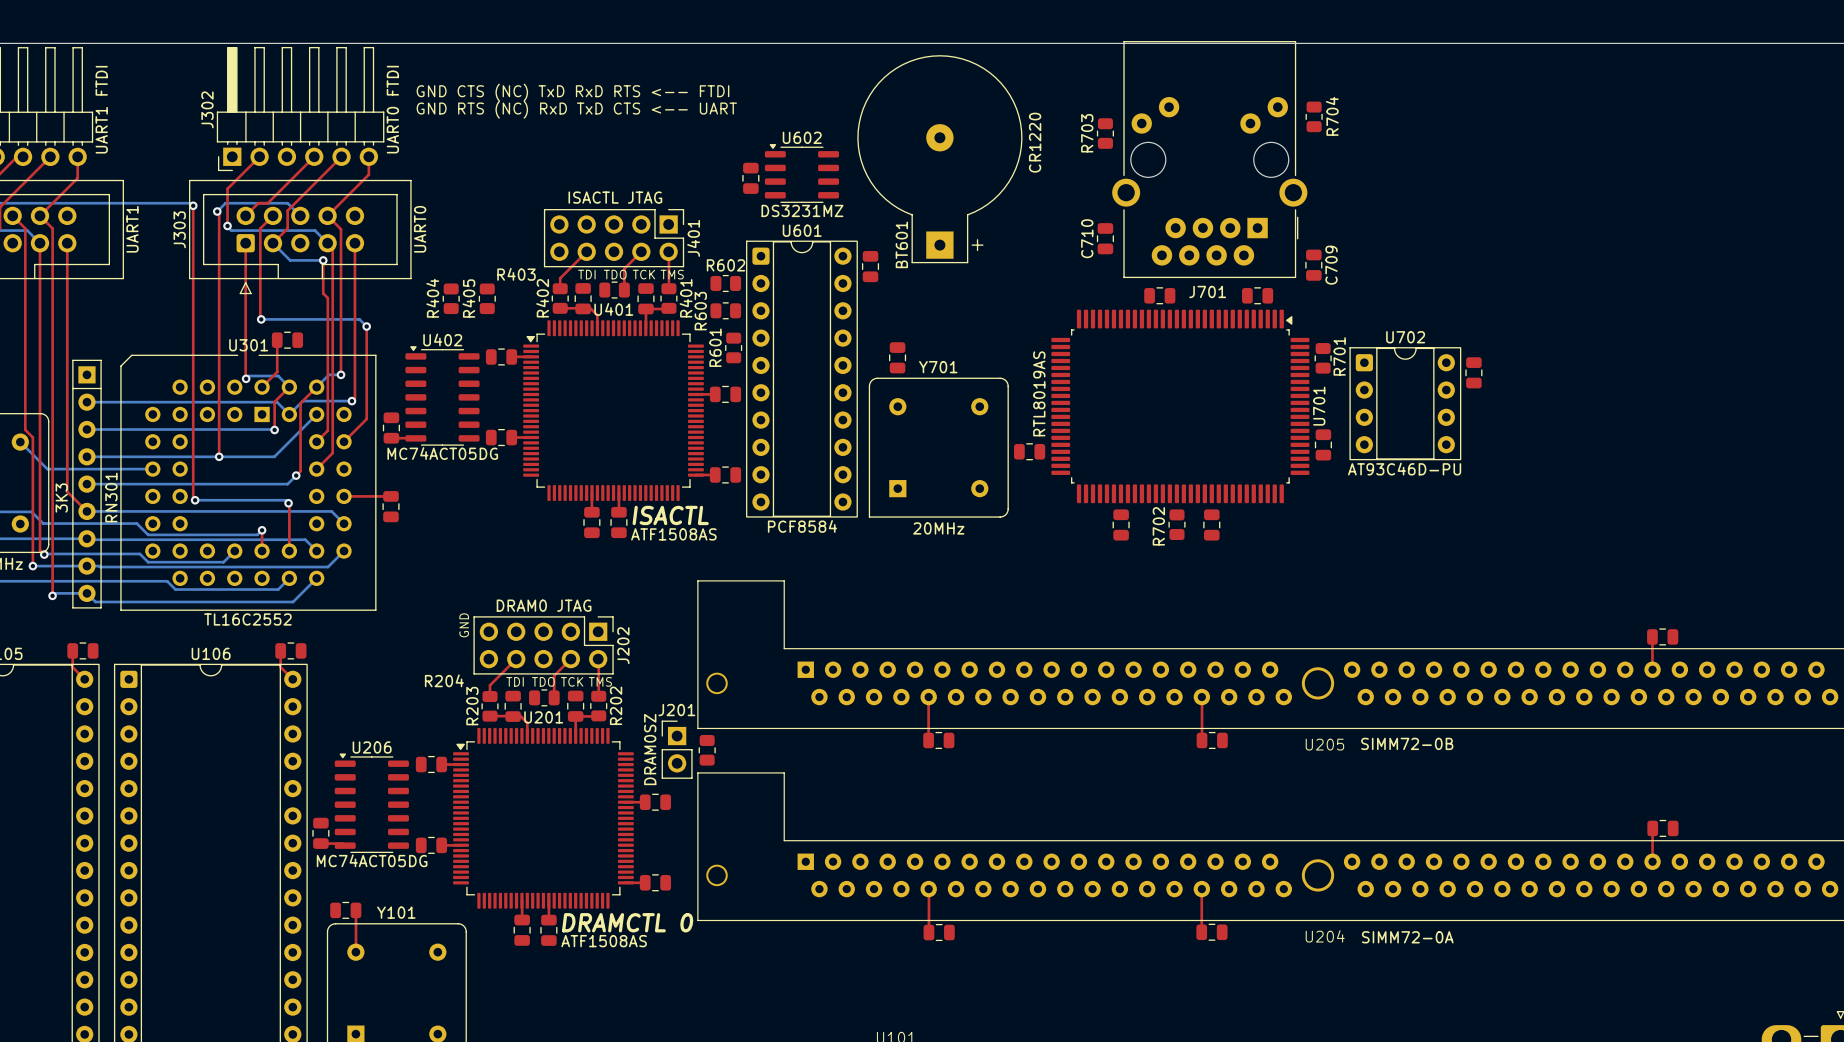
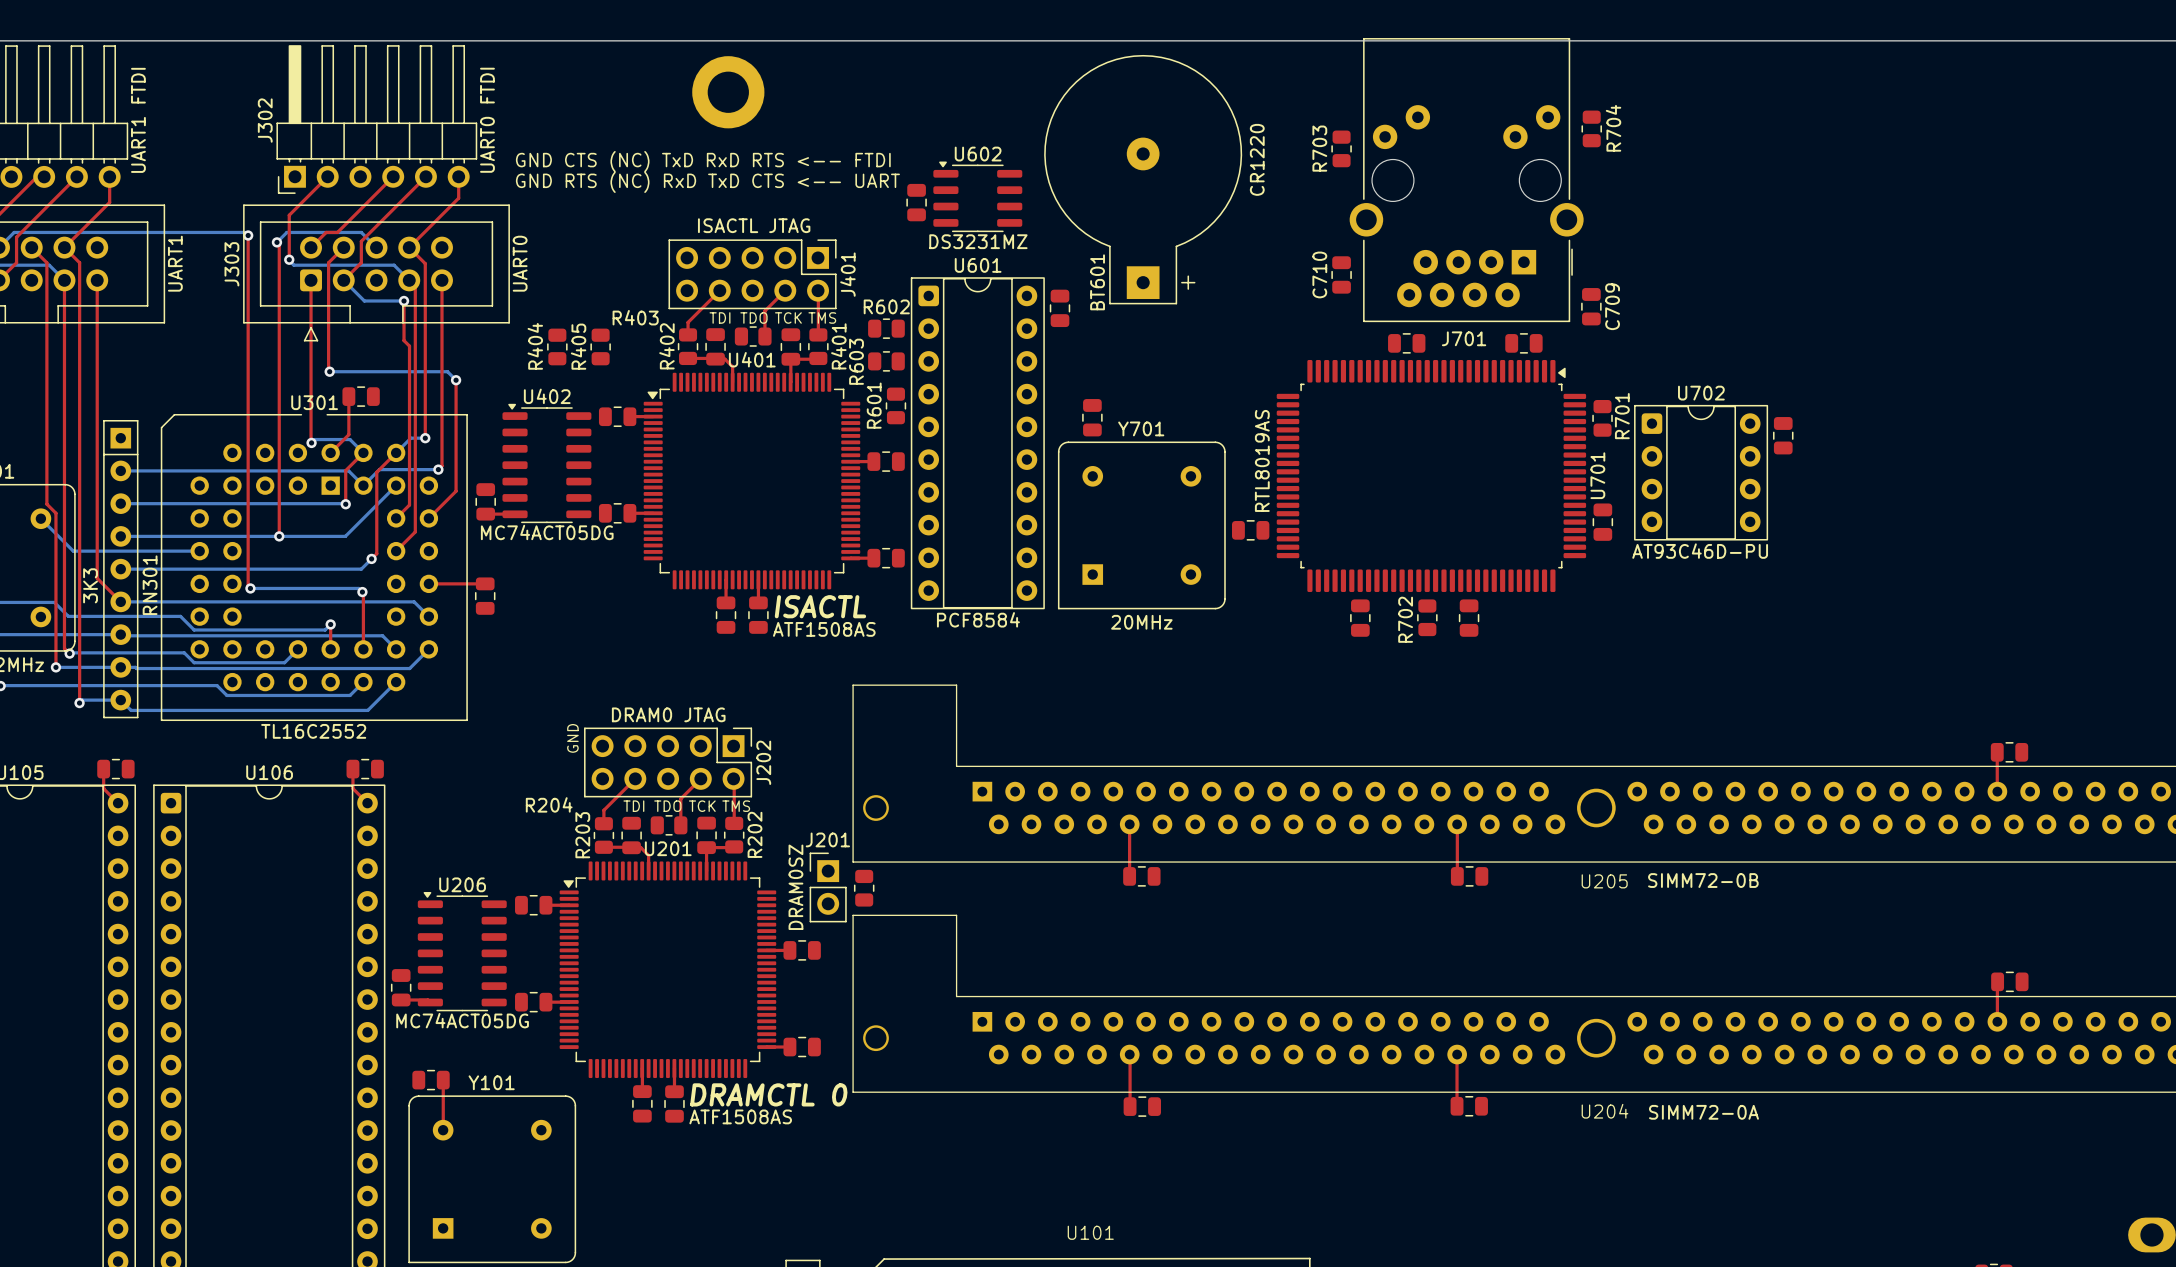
part: none -> (728, 92)
text position: GND CTS (NC) TxD RxD RTS <-- FTDI (572, 92) -> GND CTS (NC) TxD RxD RTS <-- FTDI (703, 161)
text position: GND RTS (NC) RxD TxD CTS <-- UART (576, 109) -> GND RTS (NC) RxD TxD CTS <-- UART (707, 182)

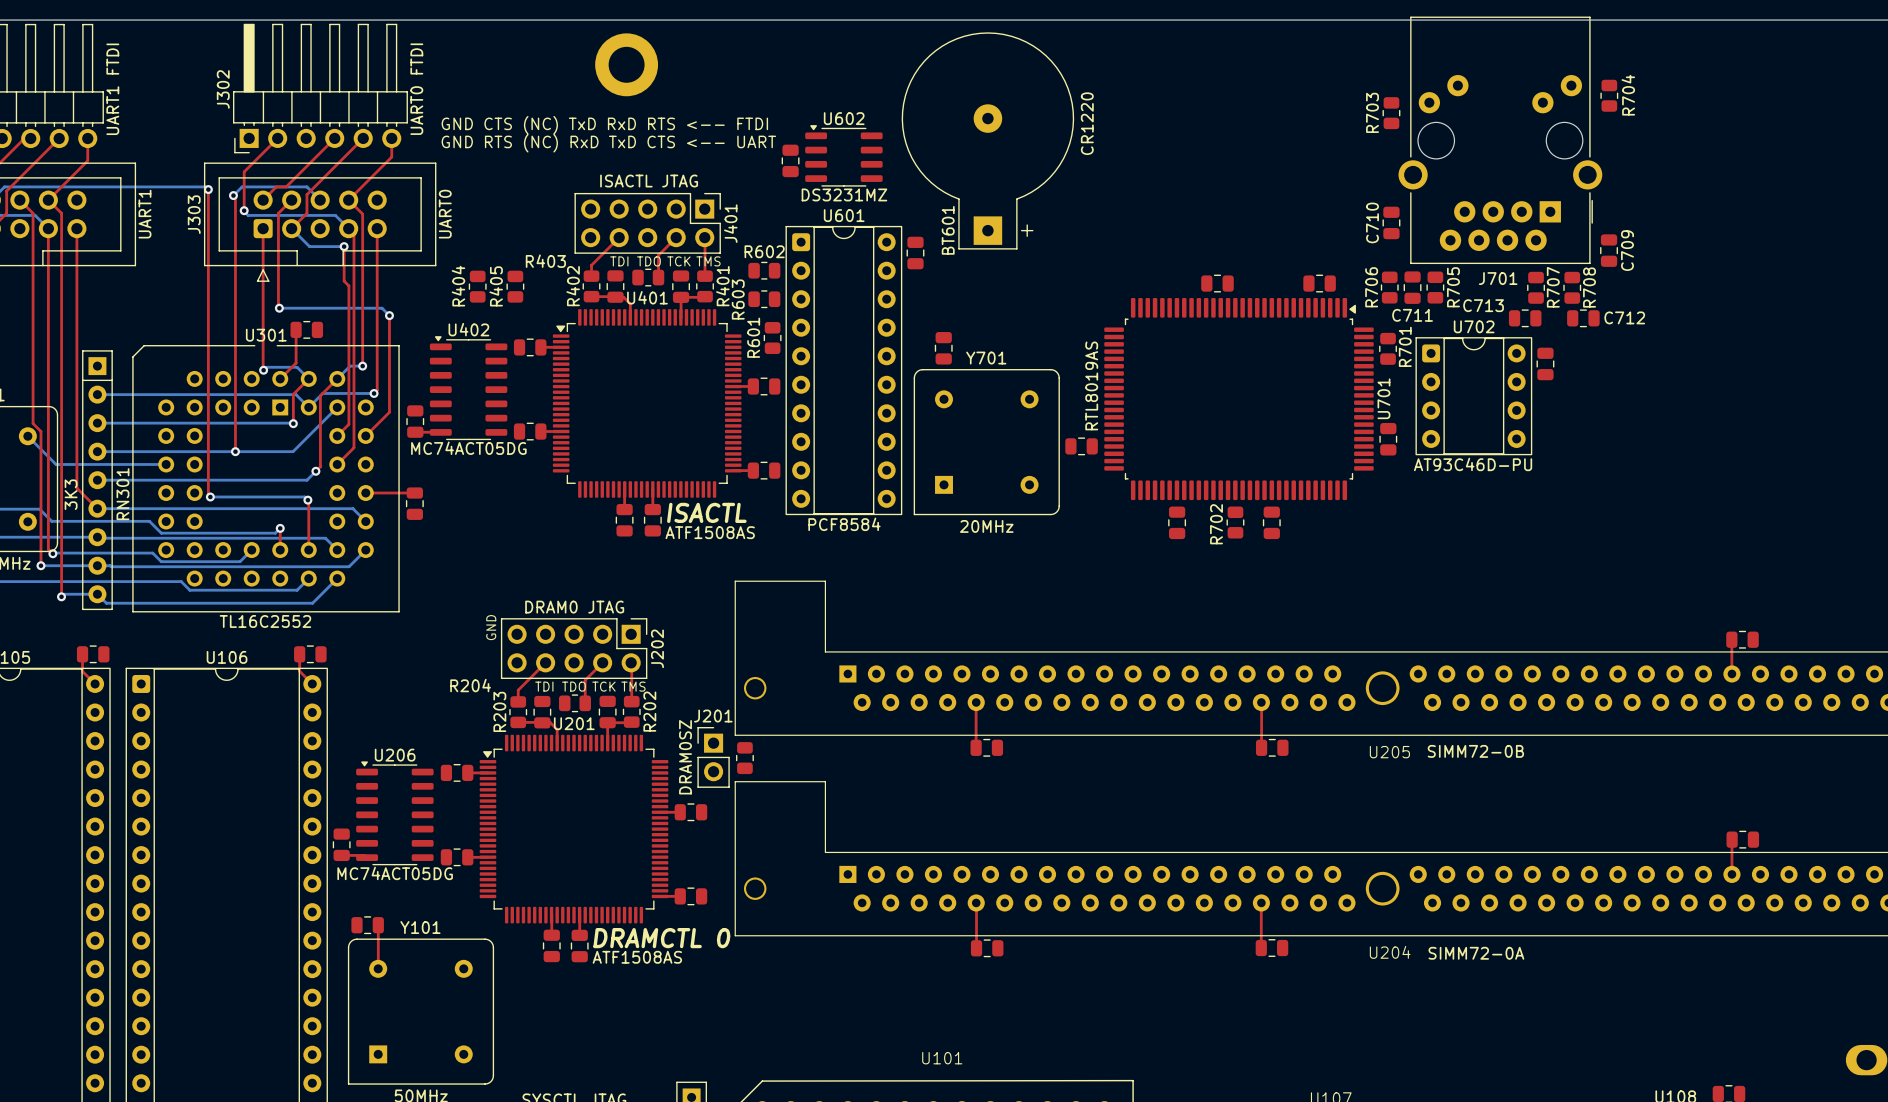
R704 position: (1591, 128) -> (1609, 95)
R703 position: (1341, 148) -> (1391, 113)
J701 position: (1466, 180) -> (1500, 140)
C710 position: (1341, 274) -> (1391, 222)
C709 position: (1591, 306) -> (1609, 250)
R705: none -> (1435, 287)
R706: none -> (1389, 287)
C711: none -> (1412, 287)
R708: none -> (1536, 287)
R707: none -> (1572, 287)
C713: none -> (1525, 318)
C712: none -> (1583, 318)

